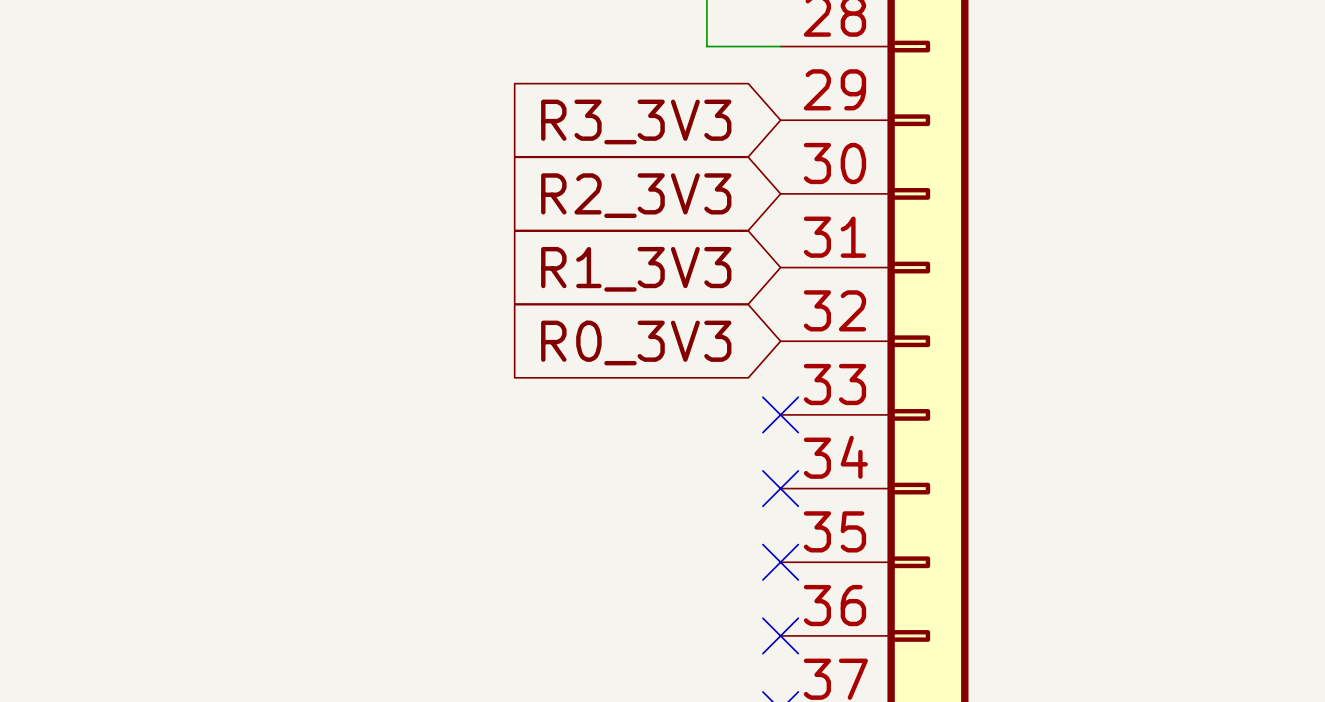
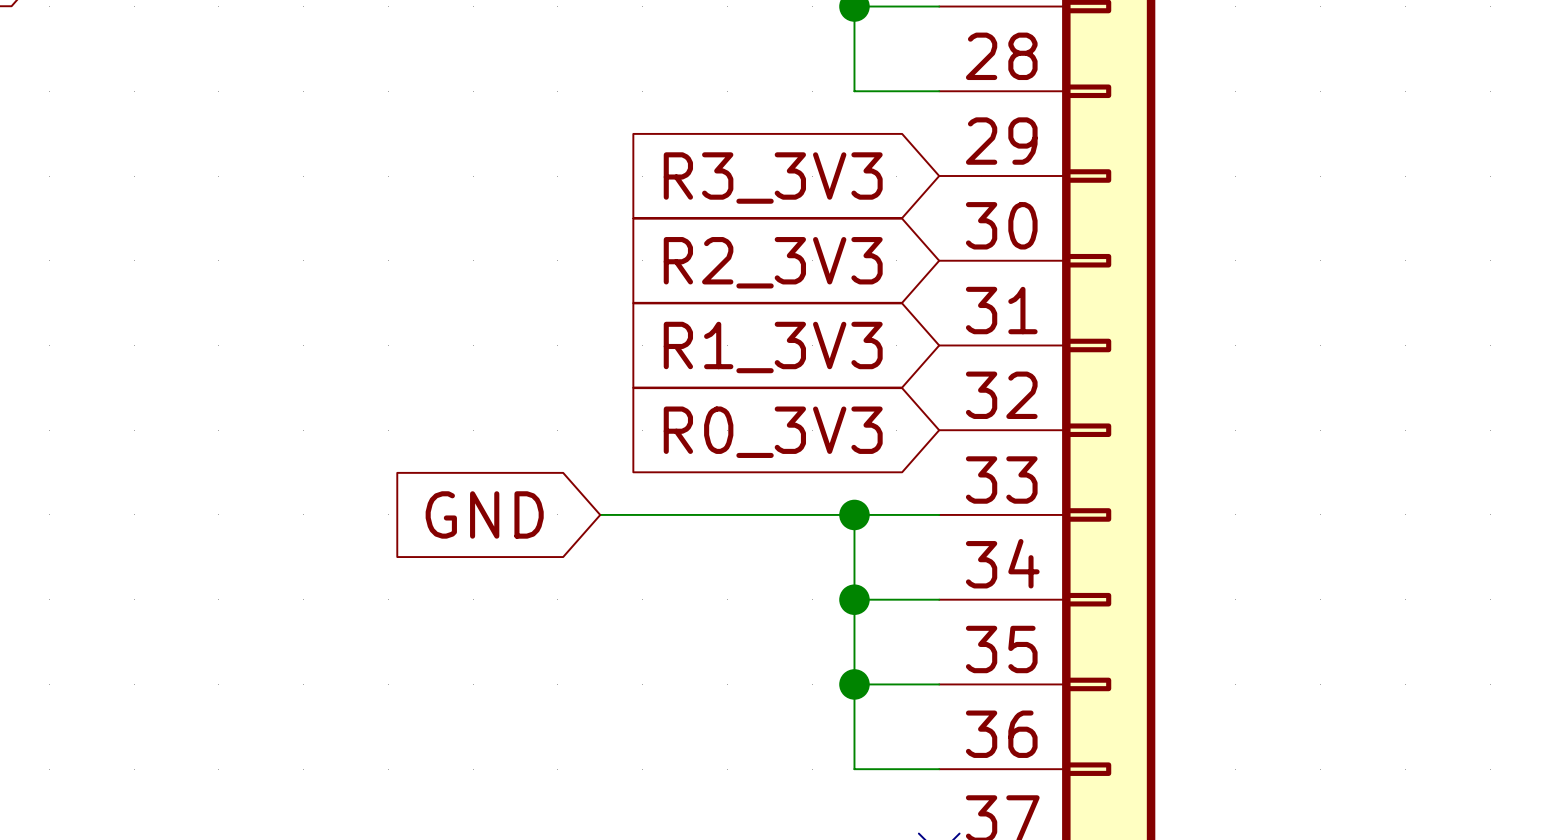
global label: none -> GND (484, 514)
wire: none -> (600, 514) (939, 514)
wire: none -> (854, 514) (854, 769) (939, 769)
junction: none -> (854, 514)
no-connect mark: (780, 414) -> none
wire: none -> (854, 599) (939, 599)
junction: none -> (854, 599)
no-connect mark: (780, 488) -> none
wire: none -> (854, 684) (939, 684)
junction: none -> (854, 684)
no-connect mark: (780, 562) -> none
no-connect mark: (780, 635) -> none

